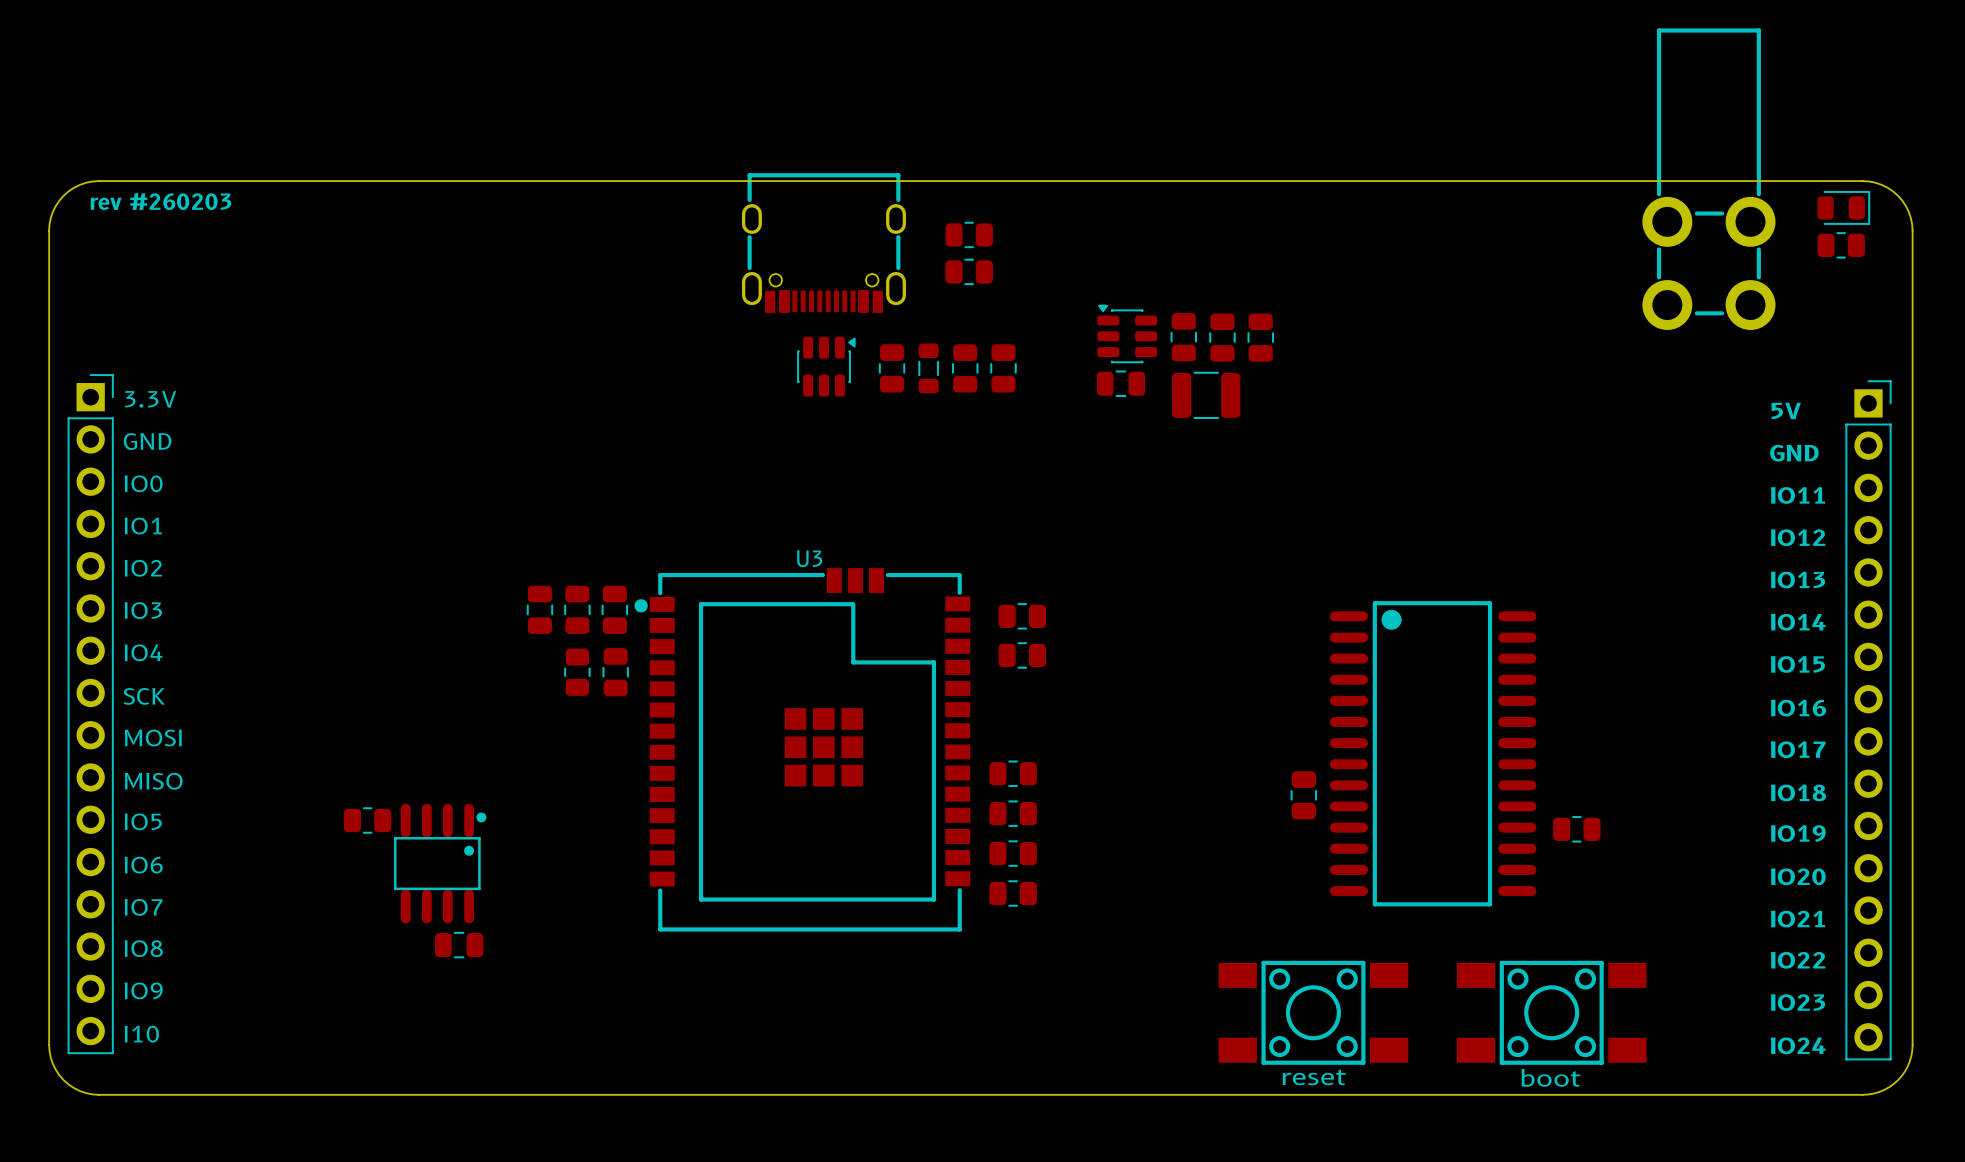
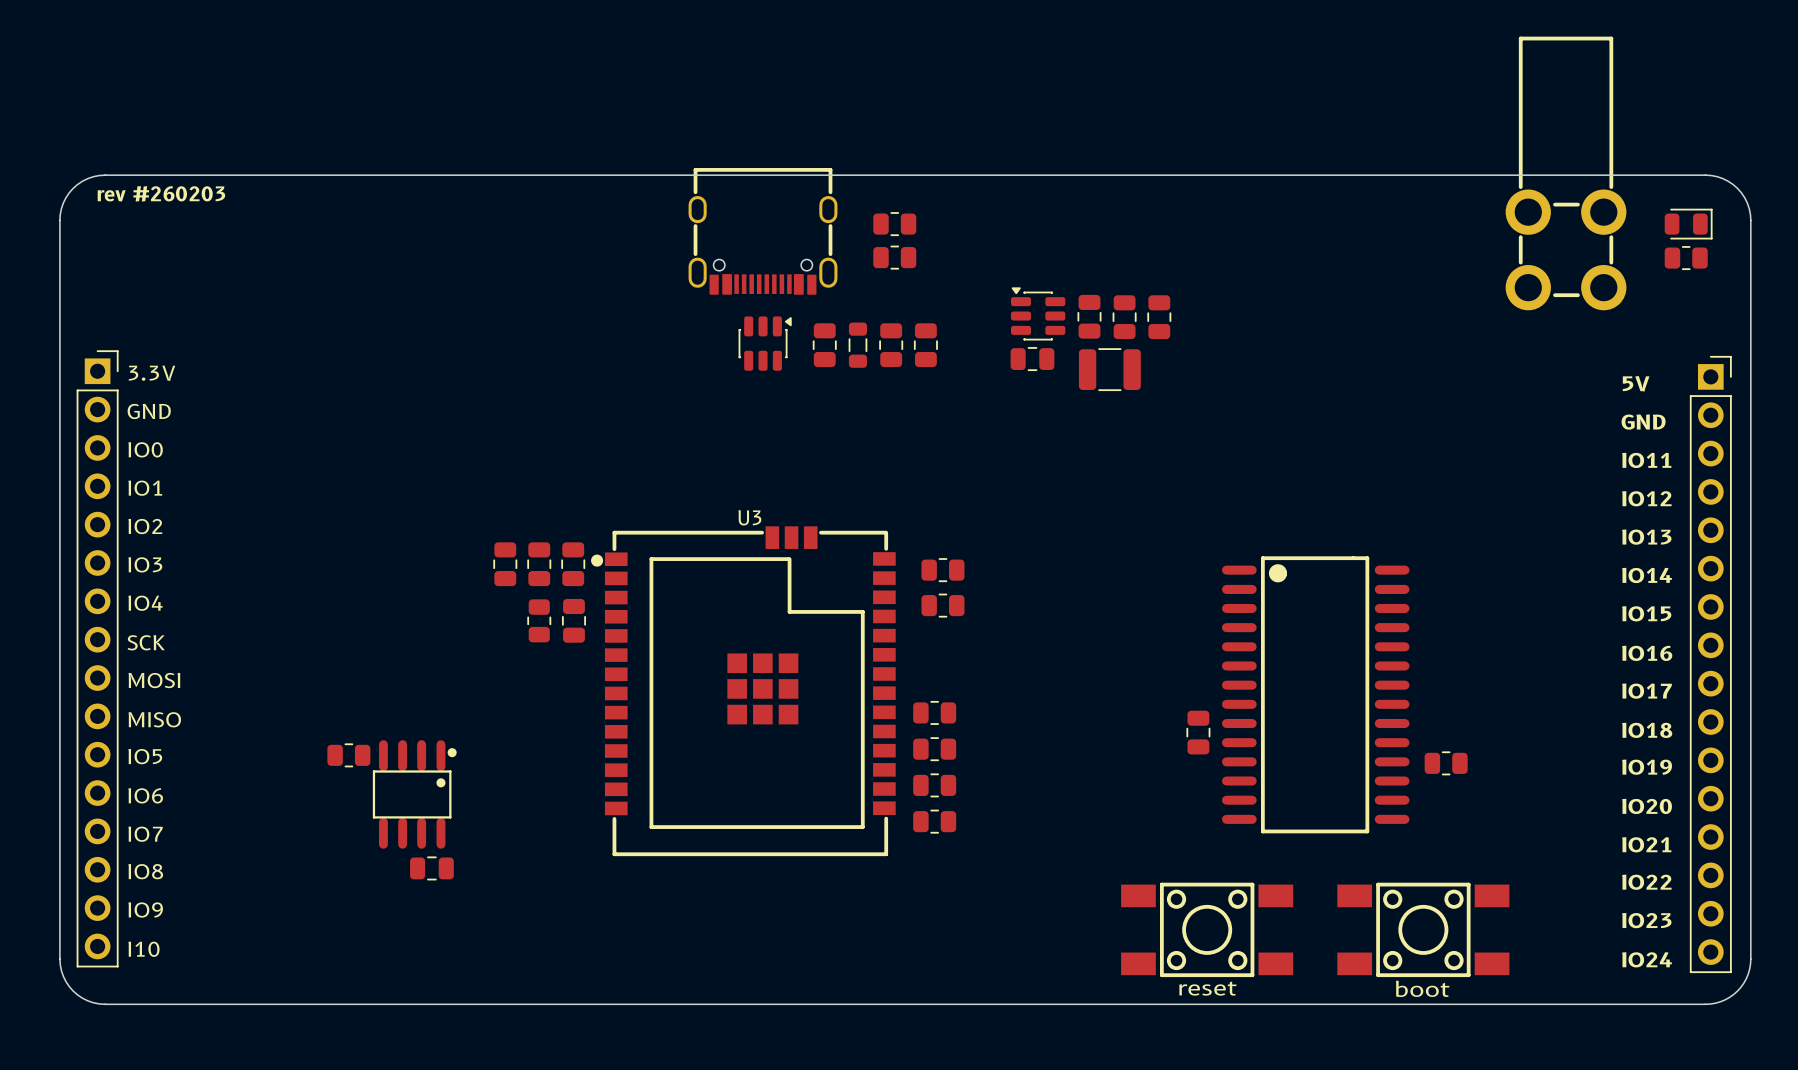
part: (1843, 207) -> none
part footprint: [1817, 232, 1865, 259] -> [1664, 208, 1713, 240]
part: none -> (1686, 258)

